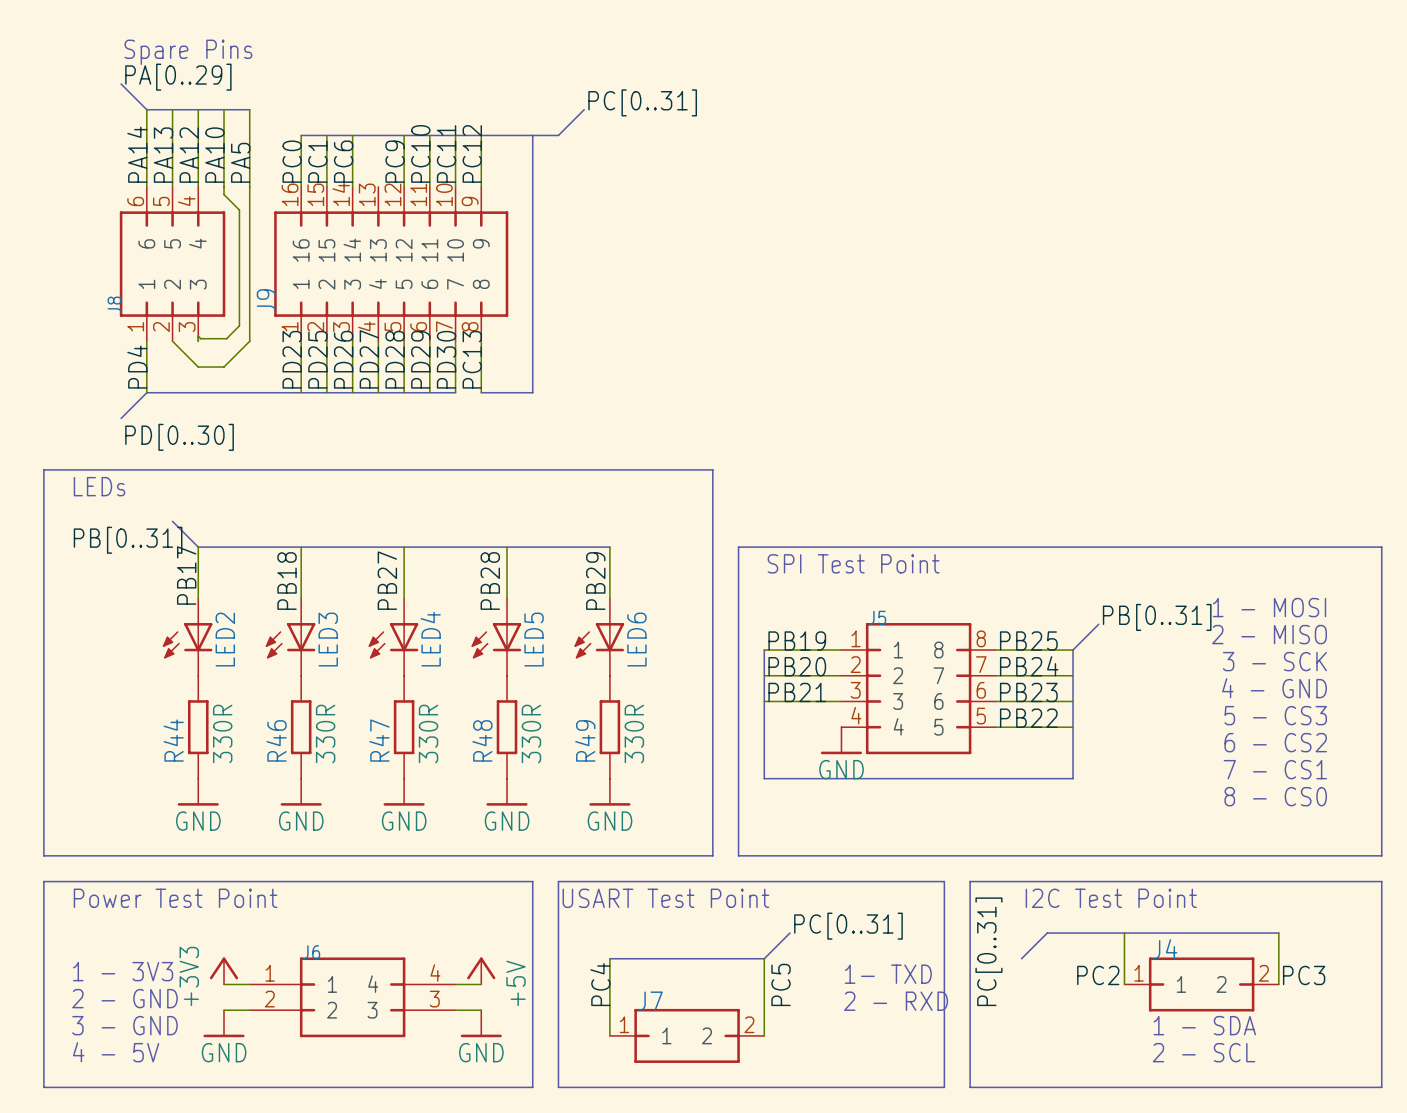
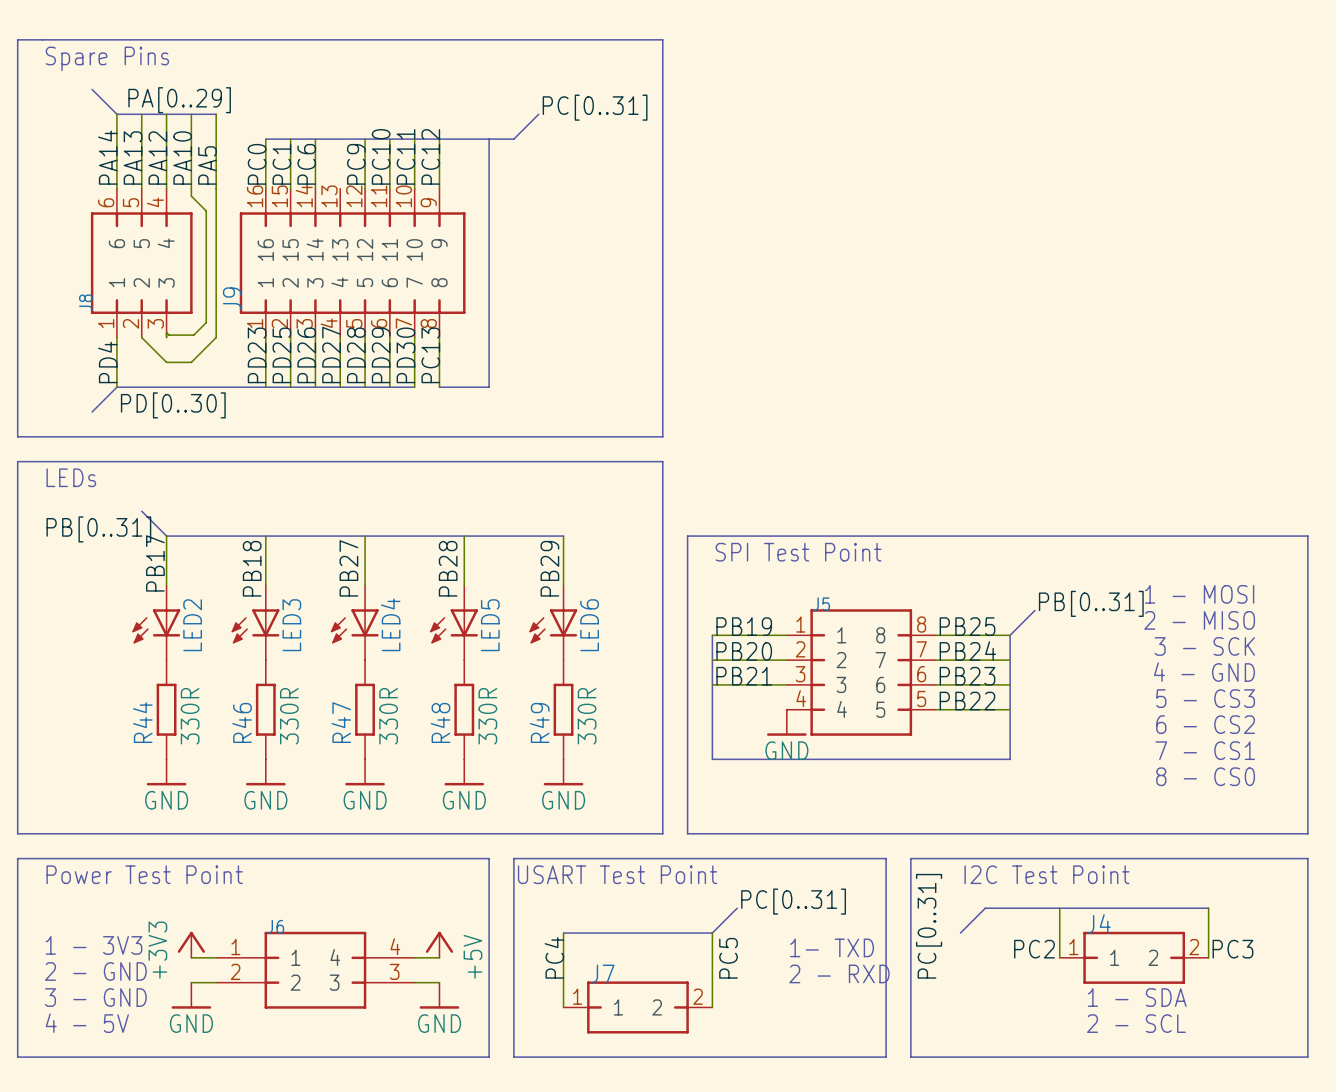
line: none -> (17, 39) (662, 39) (662, 436) (17, 436) (17, 39)
text position: Spare Pins (188, 52) -> Spare Pins (107, 58)
label position: PA[0..29] (178, 77) -> PA[0..29] (179, 100)
label position: PD[0..30] (179, 437) -> PD[0..30] (173, 405)

